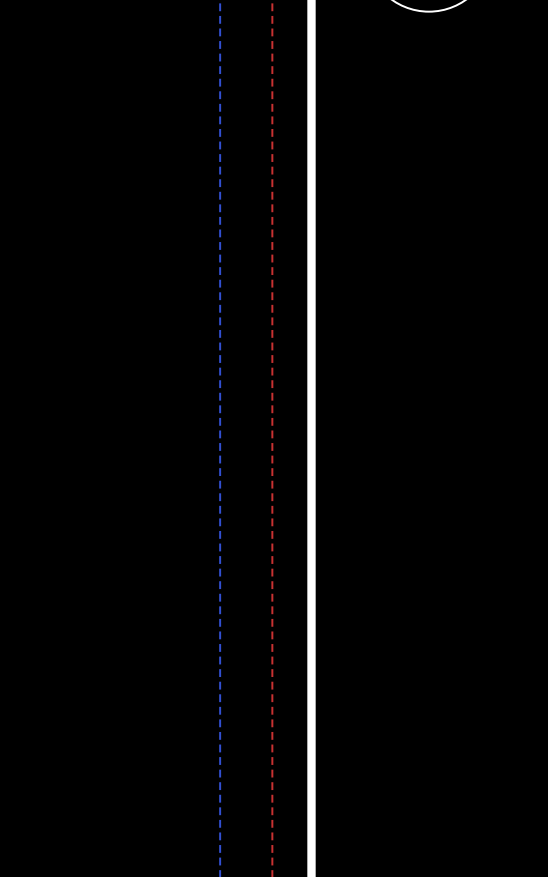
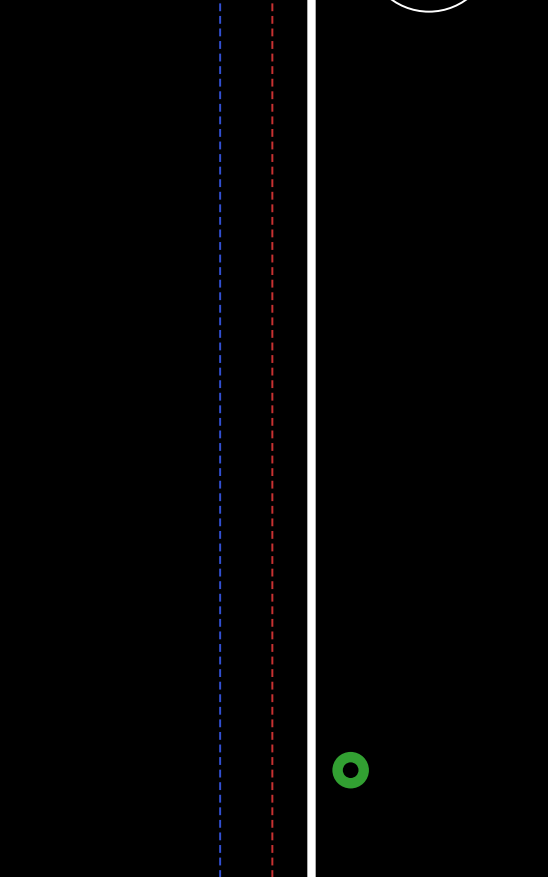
via: none -> (350, 770)

